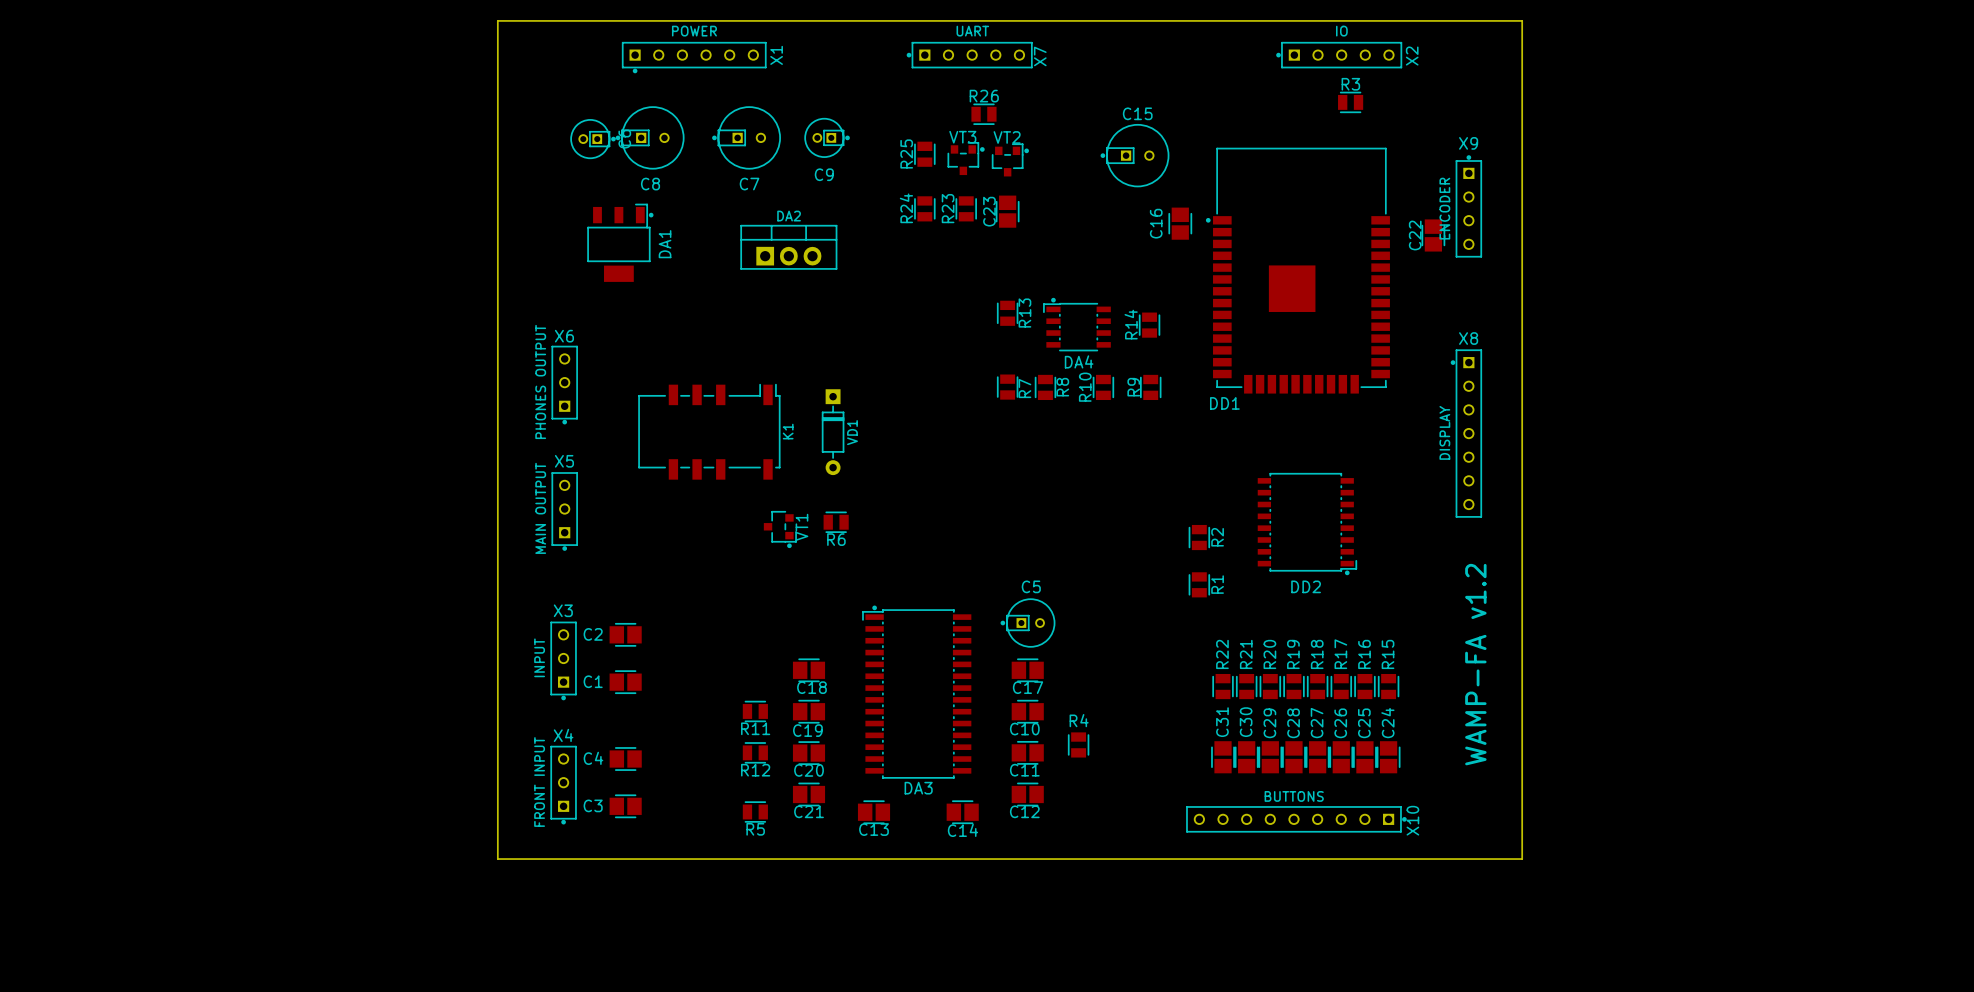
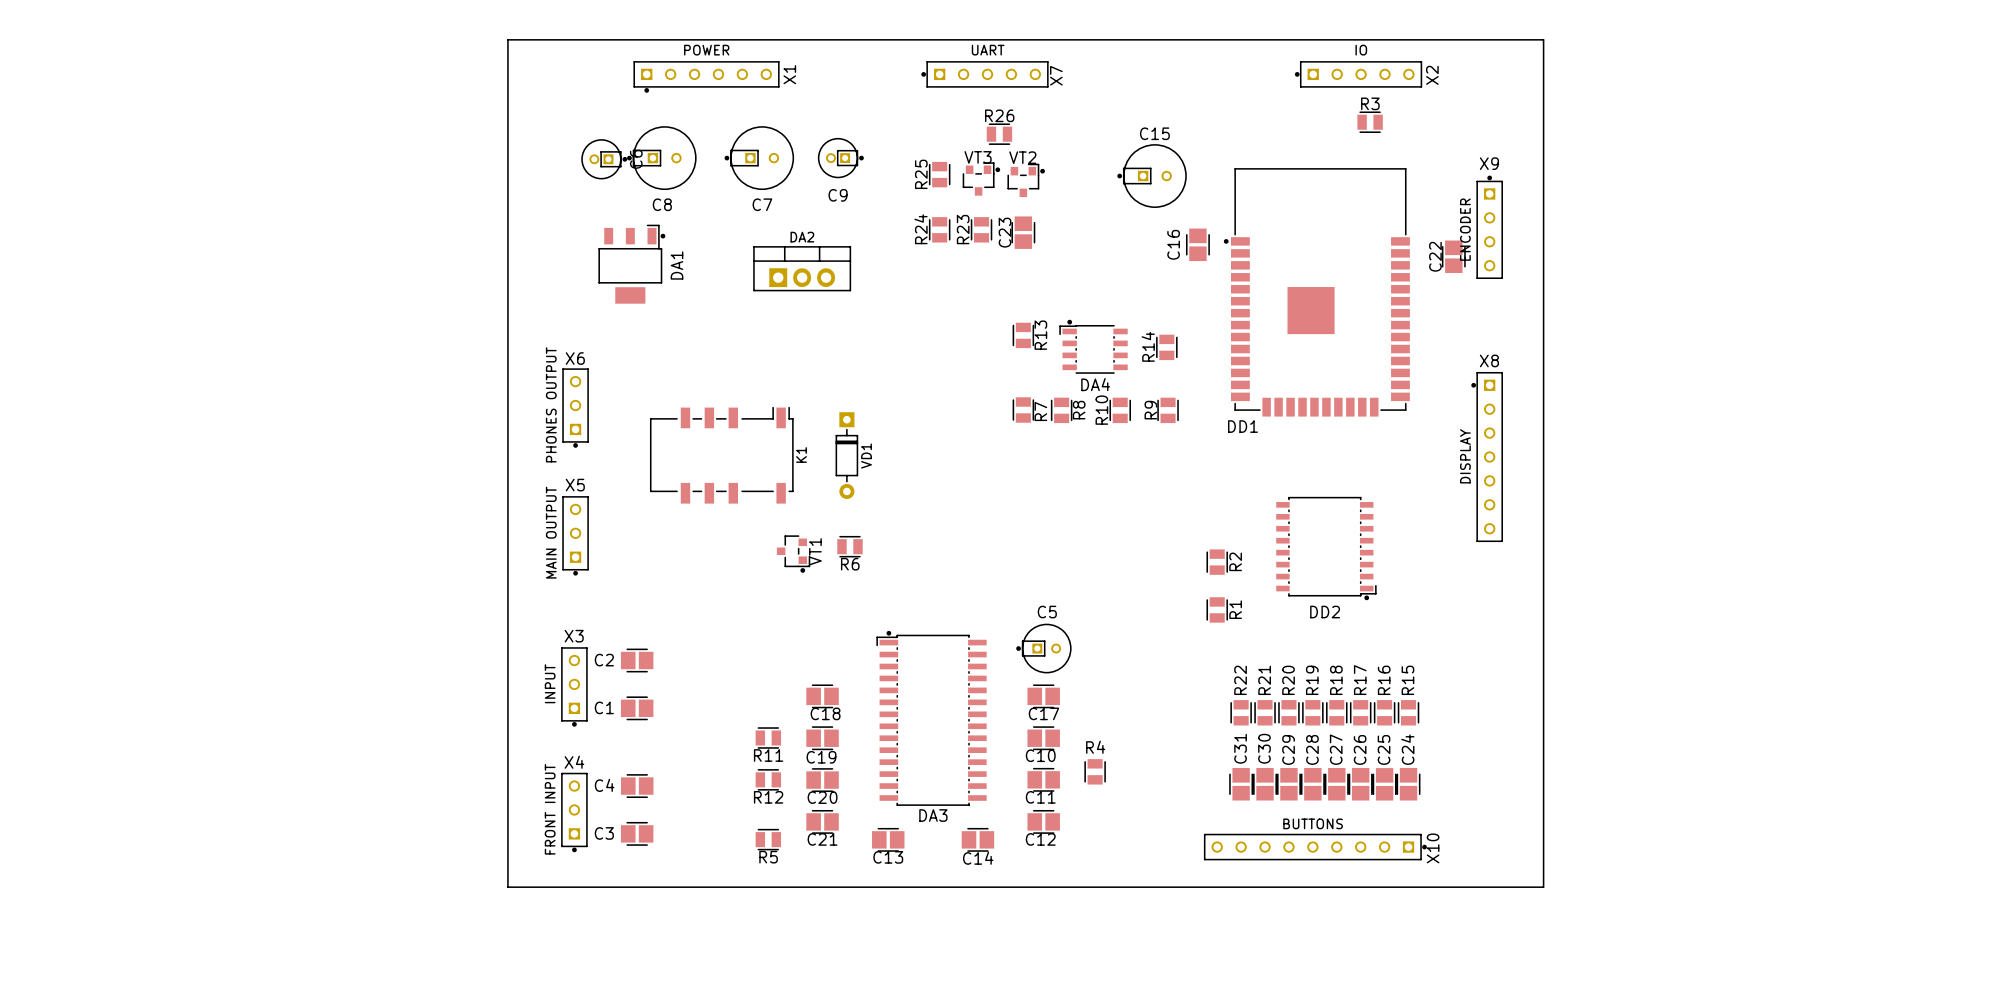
text: WAMP-FA v1.2 (1475, 664) -> none

